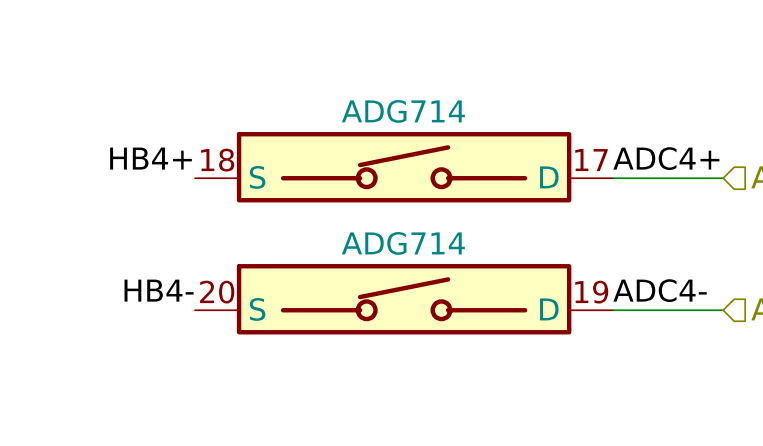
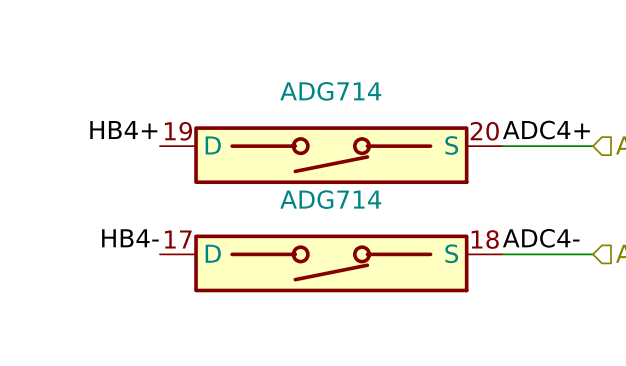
part rotation: 0° (404, 167) -> 180° (331, 263)
part rotation: 0° (404, 299) -> 180° (331, 155)

